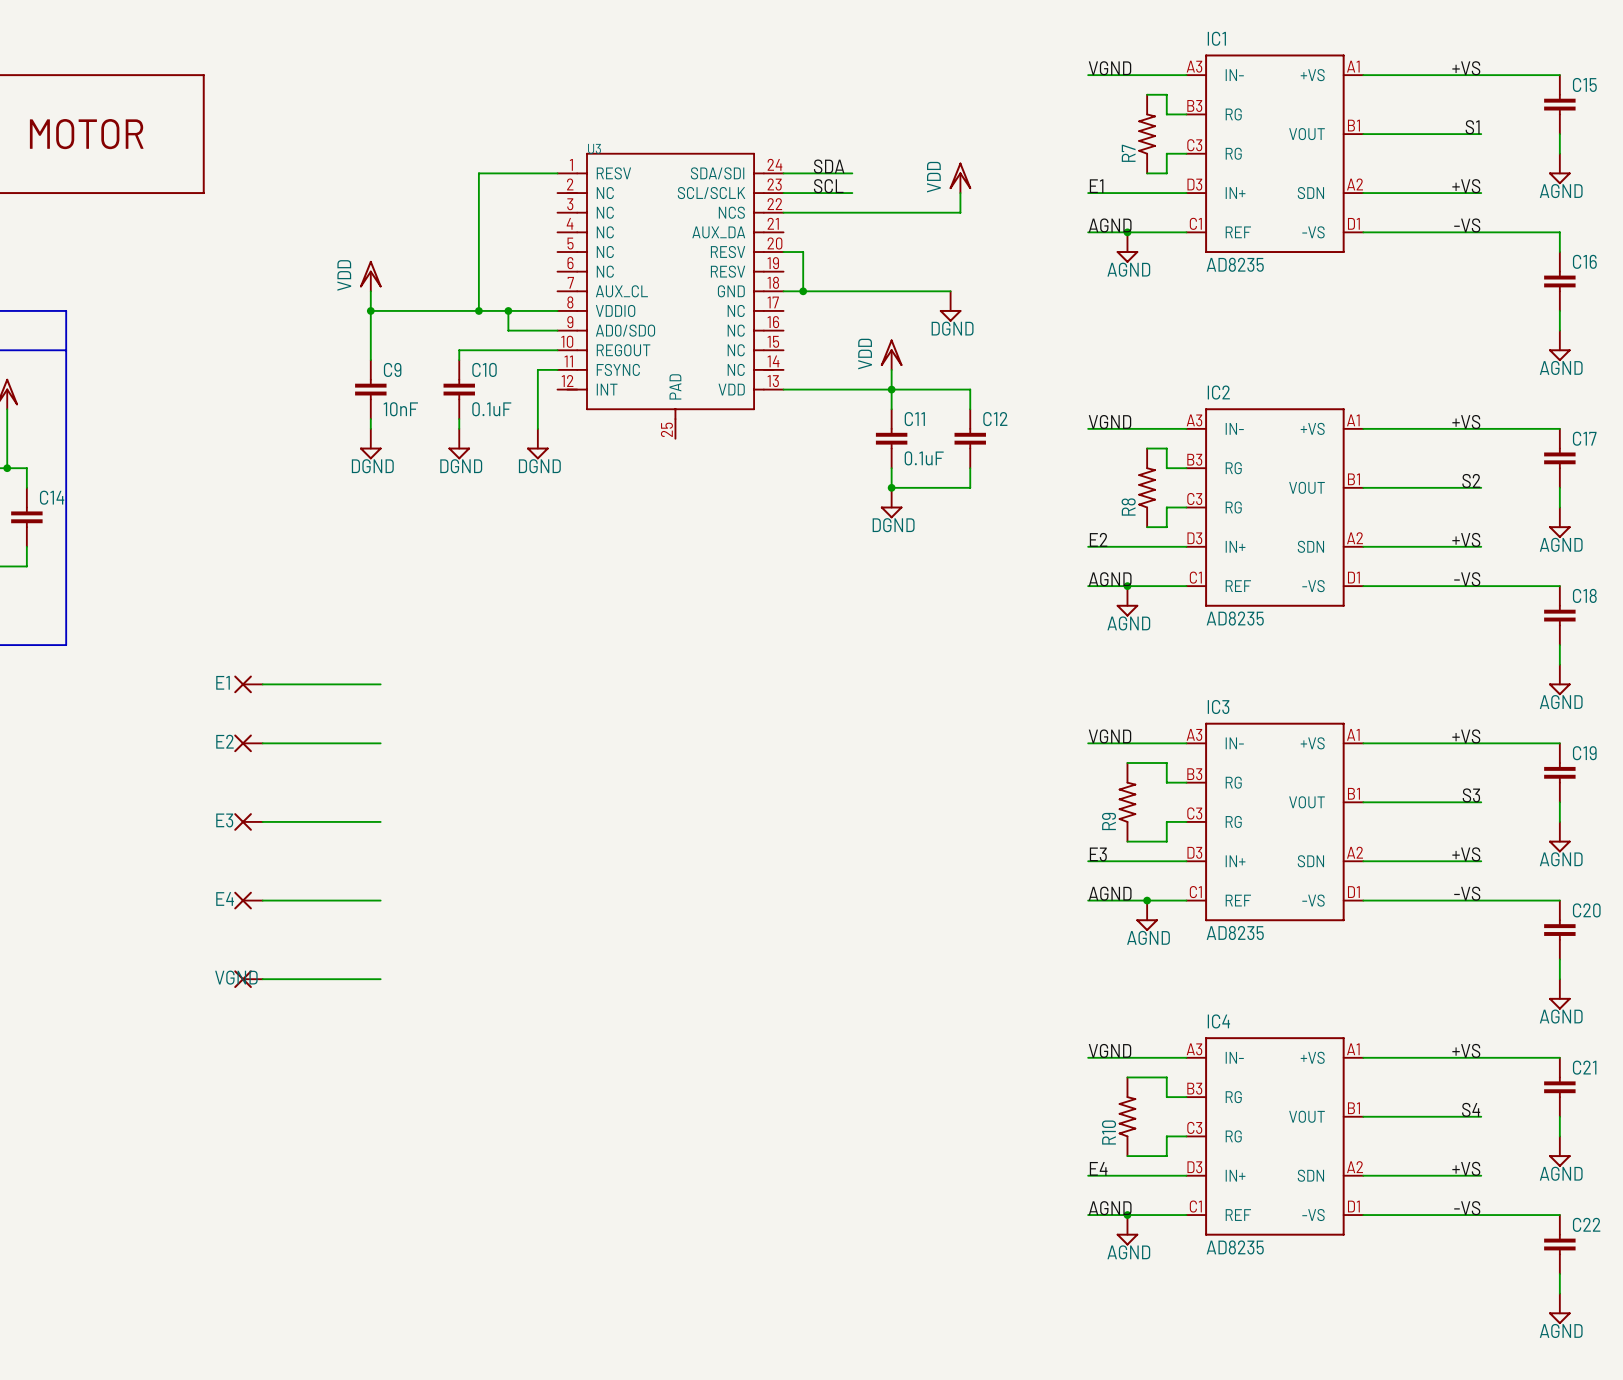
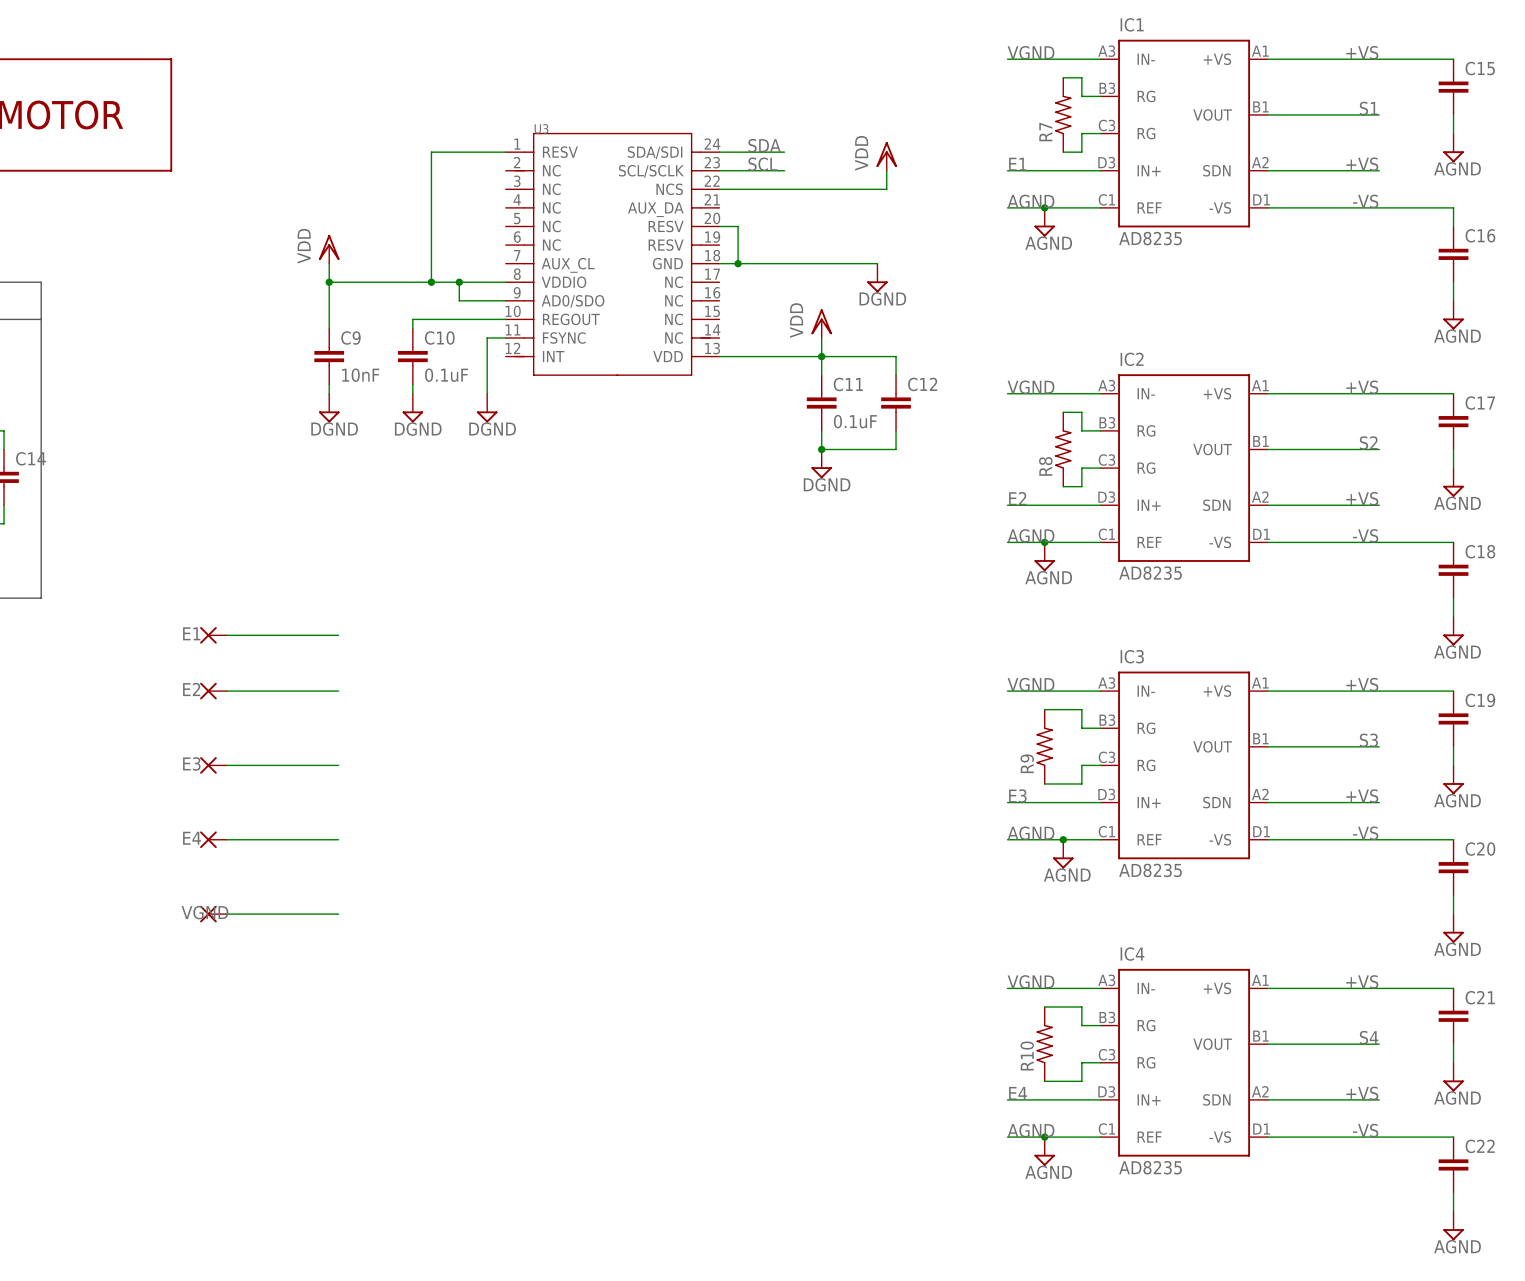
U3 symbol: [557, 153, 784, 439] -> [505, 133, 720, 376]

